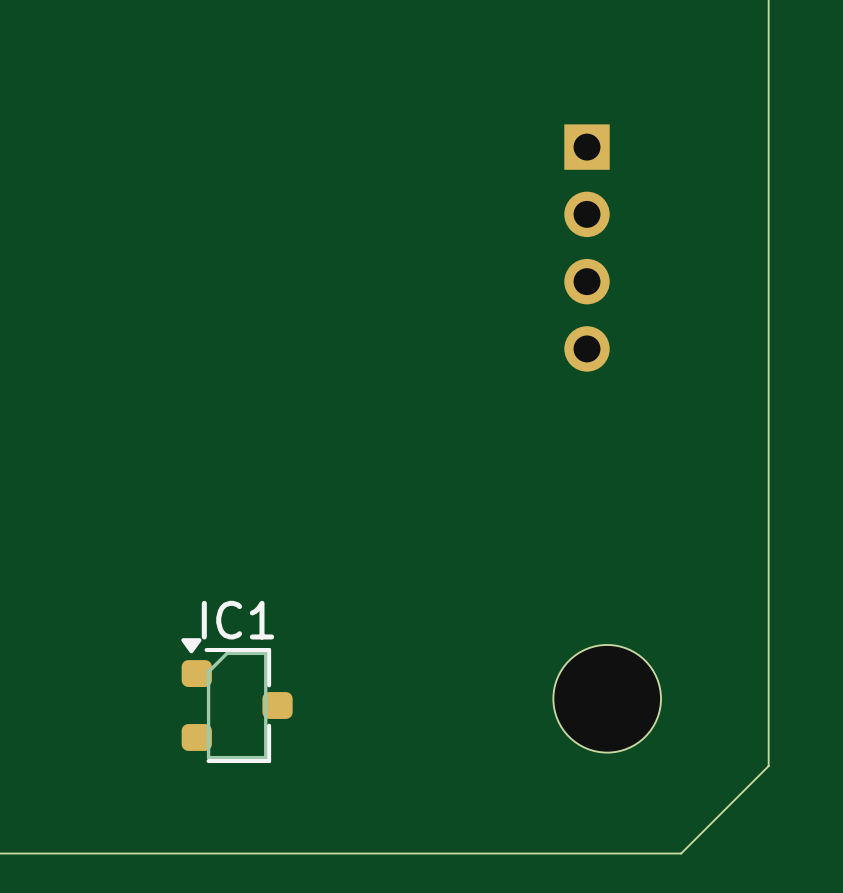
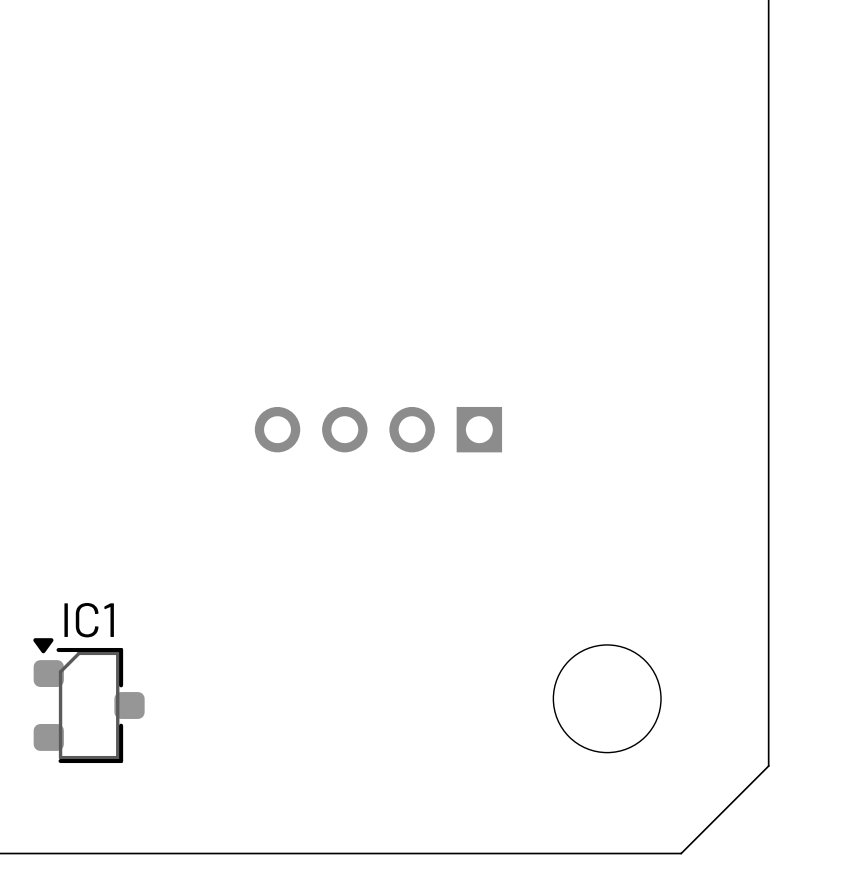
part rotation: 0° (587, 248) -> 90° clockwise (378, 429)
part position: (587, 248) -> (378, 429)
IC1 position: (236, 700) -> (88, 700)

